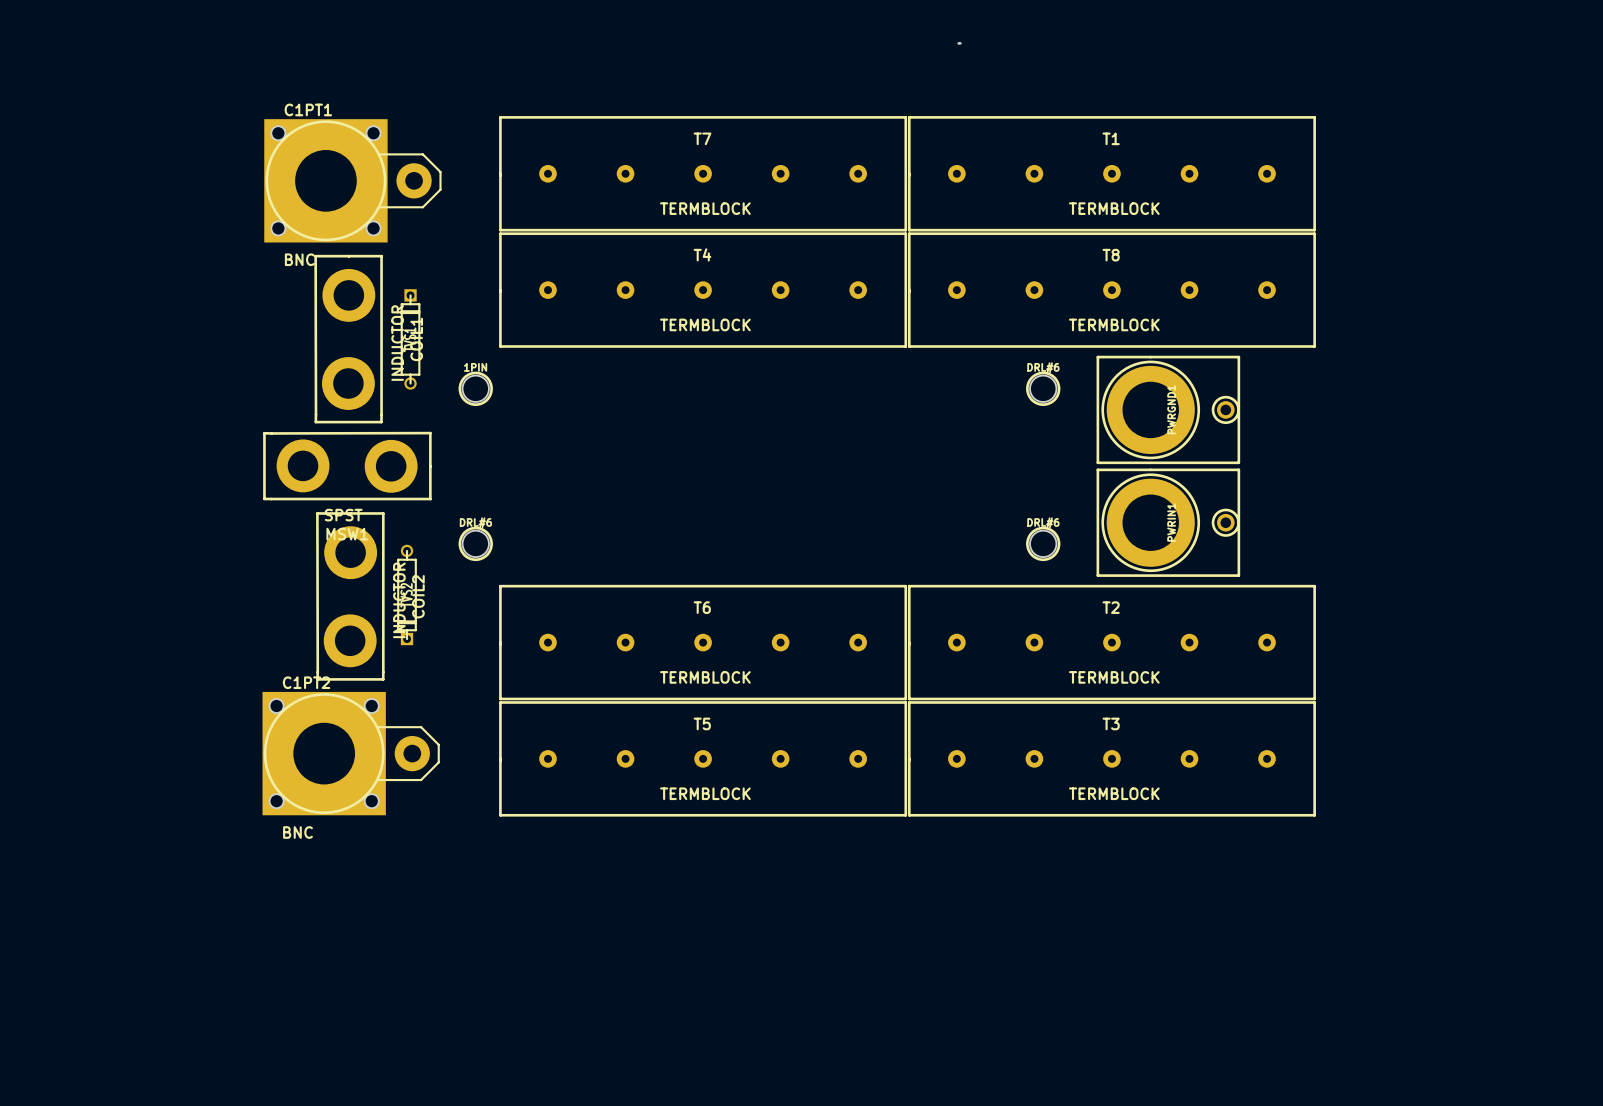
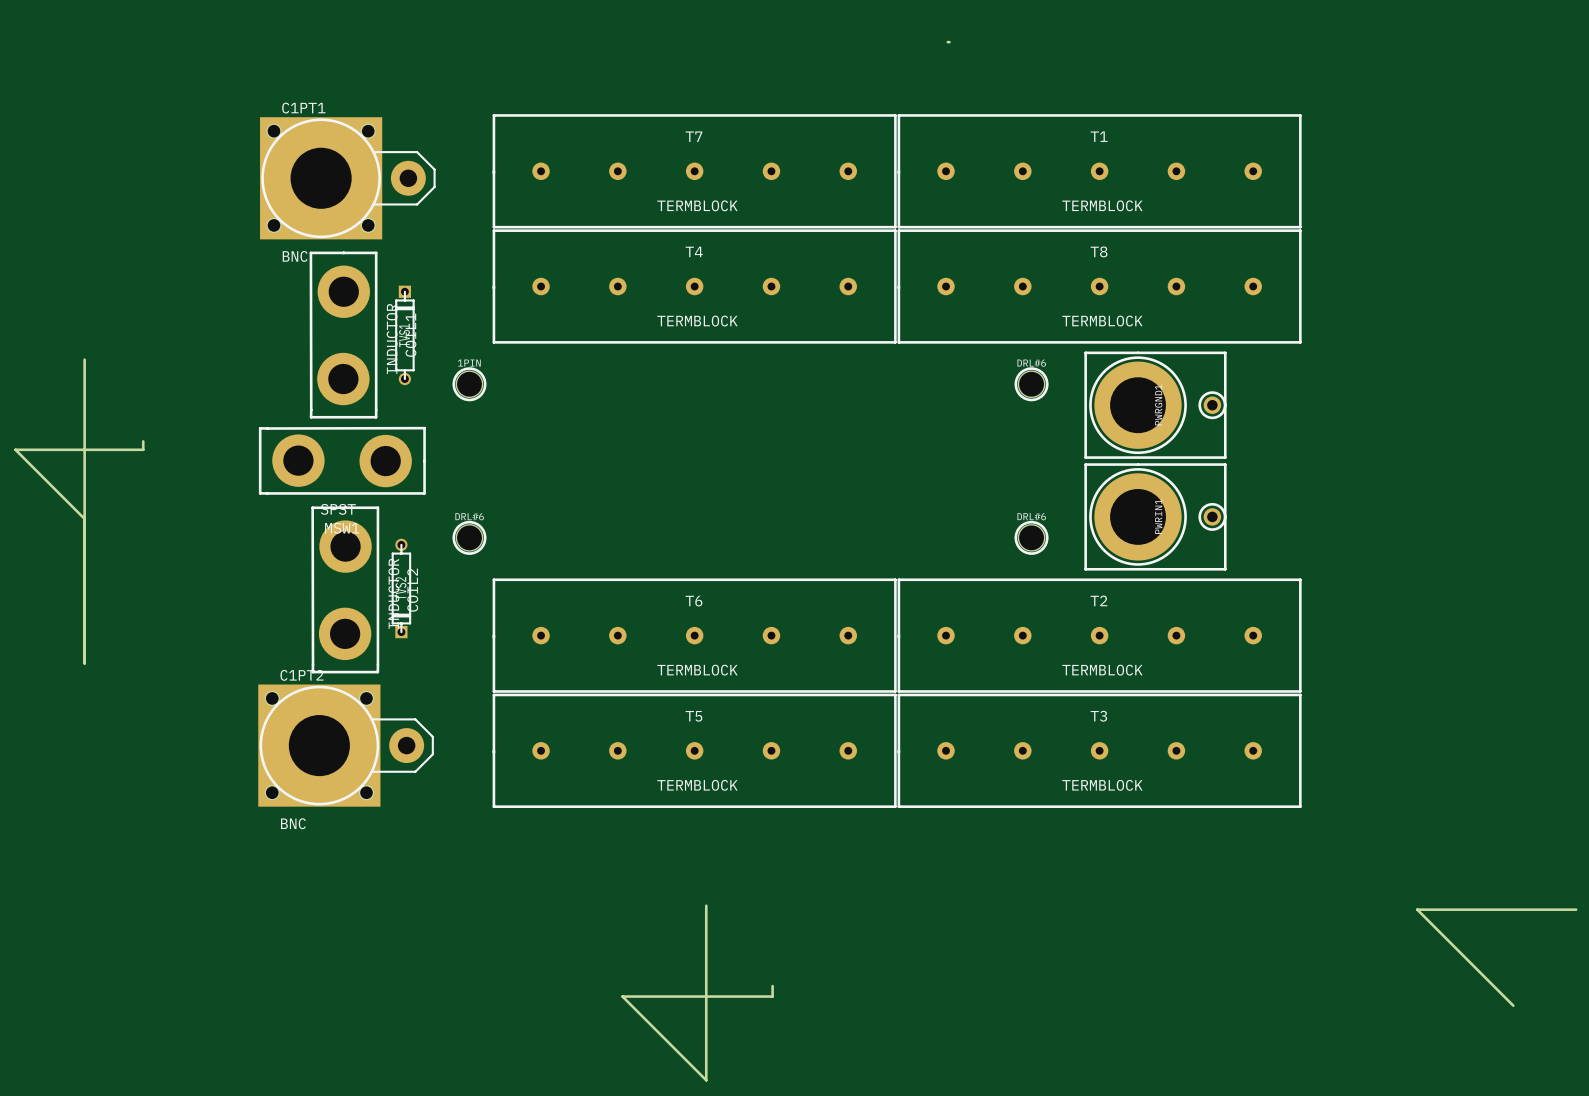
board edge: none -> (84, 359) (84, 663)
board edge: none -> (143, 441) (143, 449) (15, 449) (84, 518)
board edge: none -> (706, 905) (706, 1080) (622, 996) (772, 996) (772, 986)
board edge: none -> (1576, 909) (1417, 909) (1513, 1005)

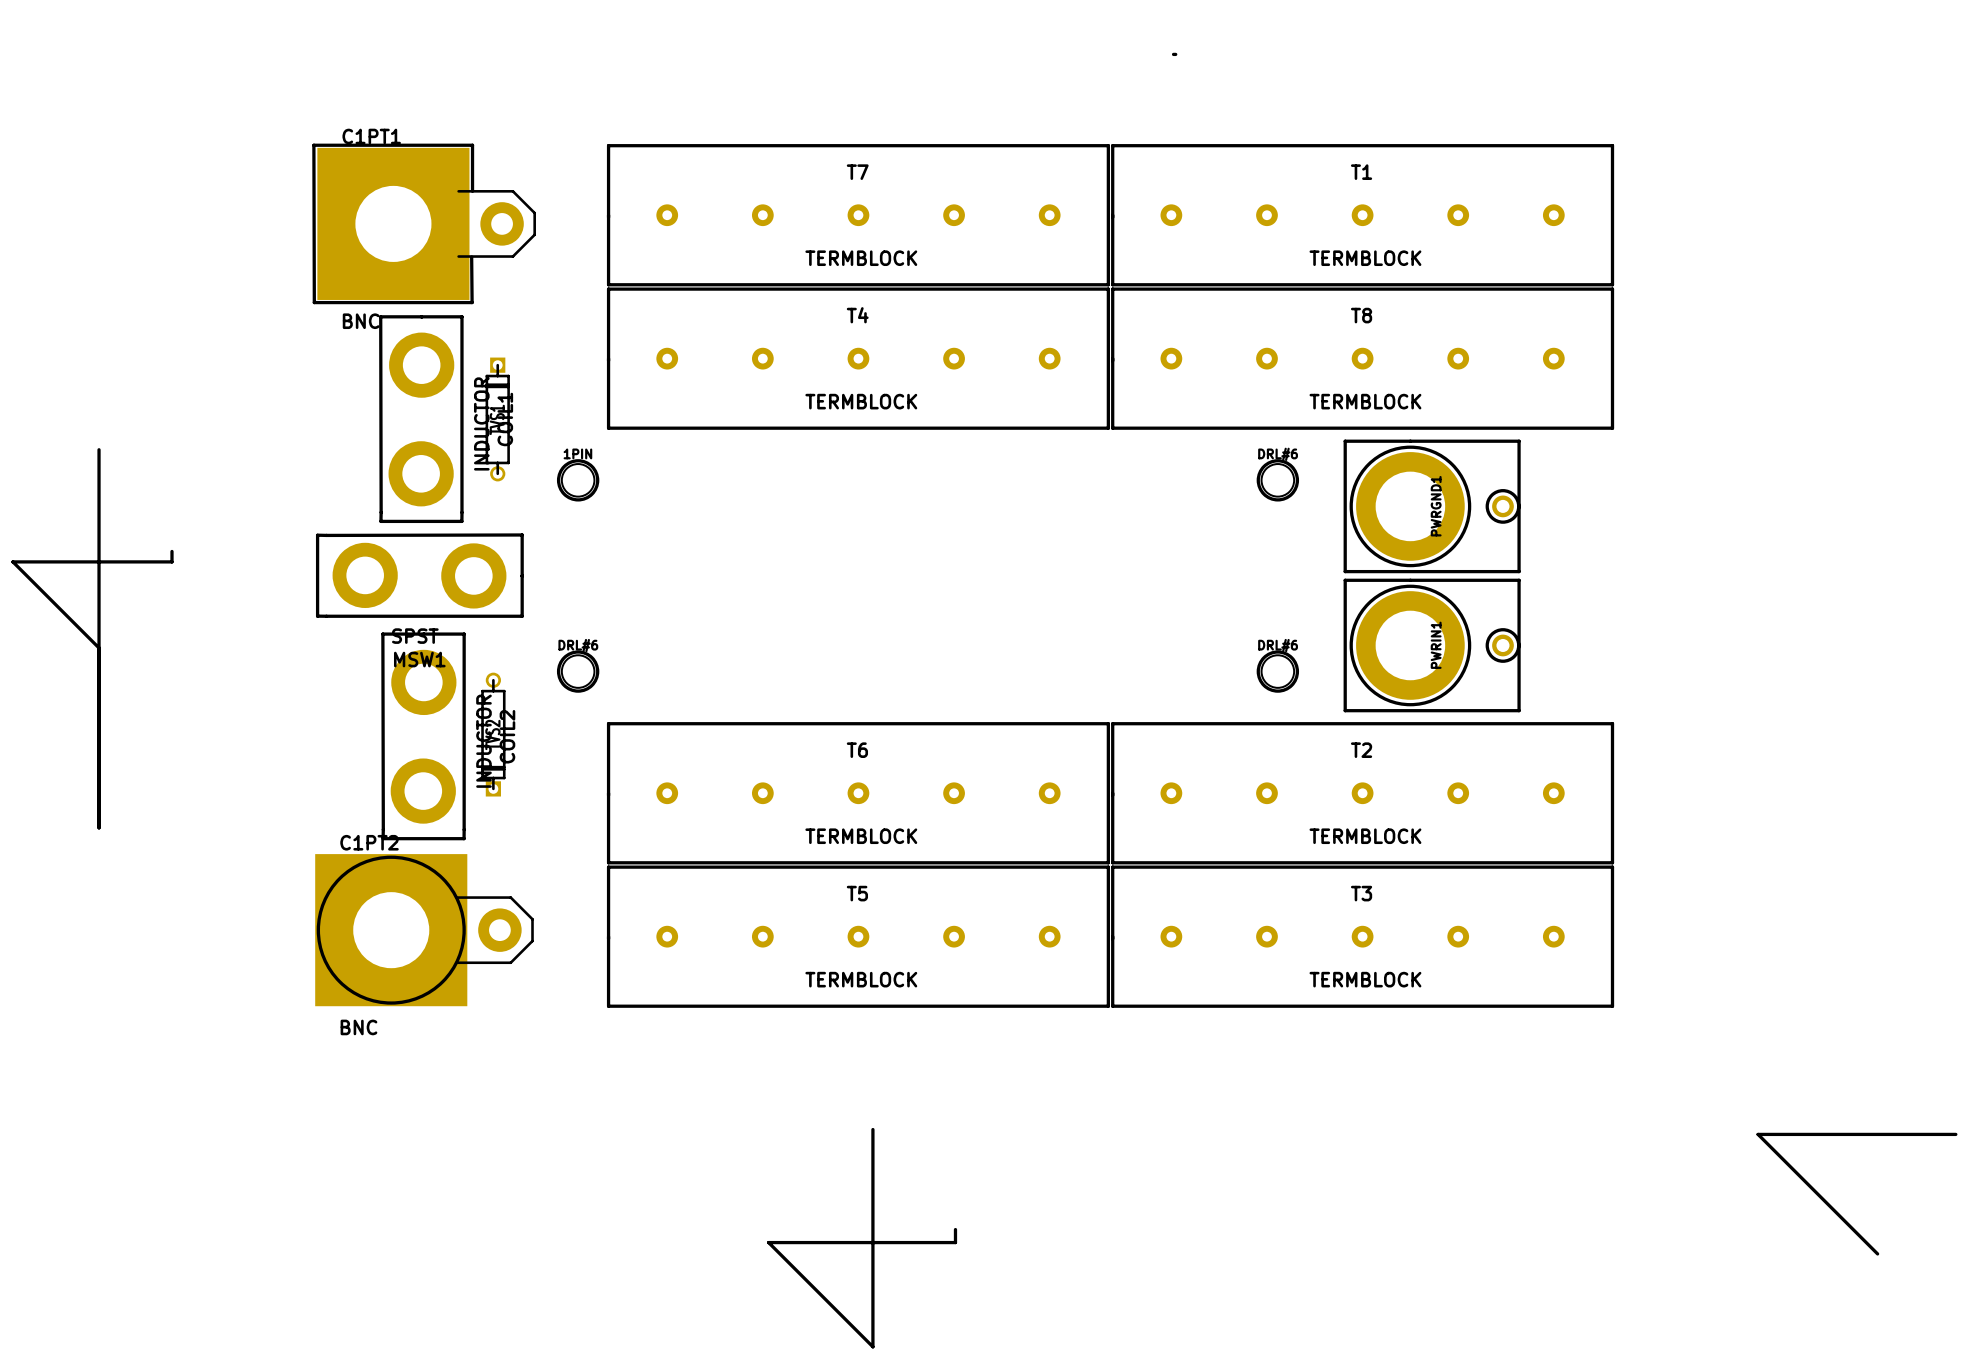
C1PT1 footprint: [260, 117, 436, 240] -> [312, 143, 536, 305]
C1PT2 footprint: [258, 684, 434, 807] -> [315, 854, 534, 1007]

